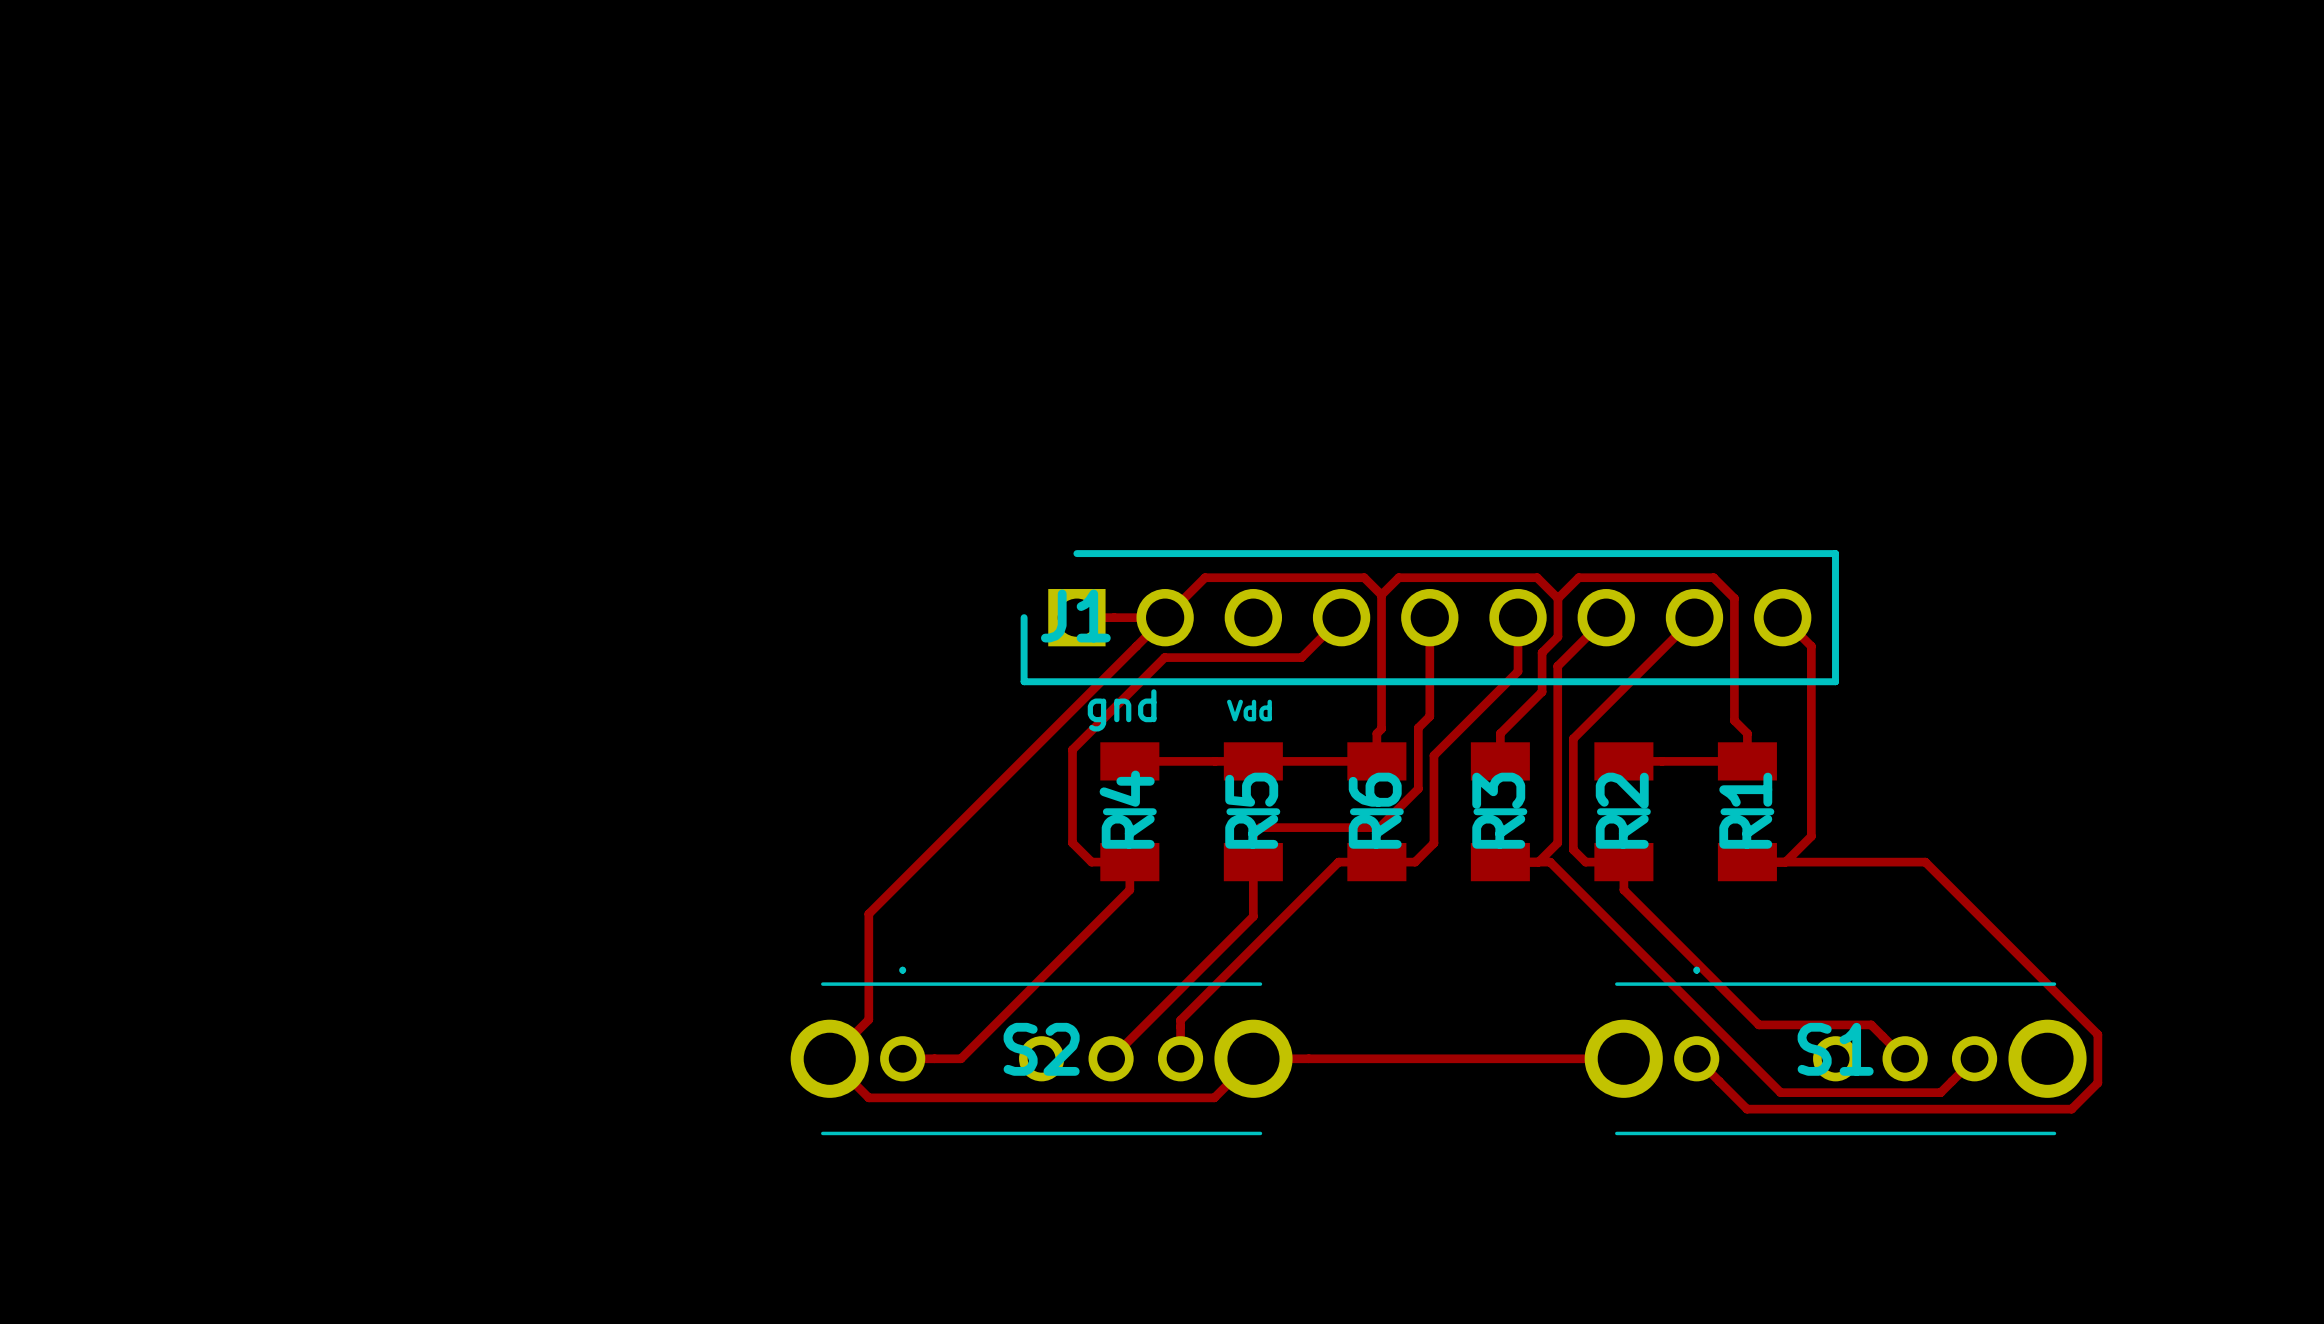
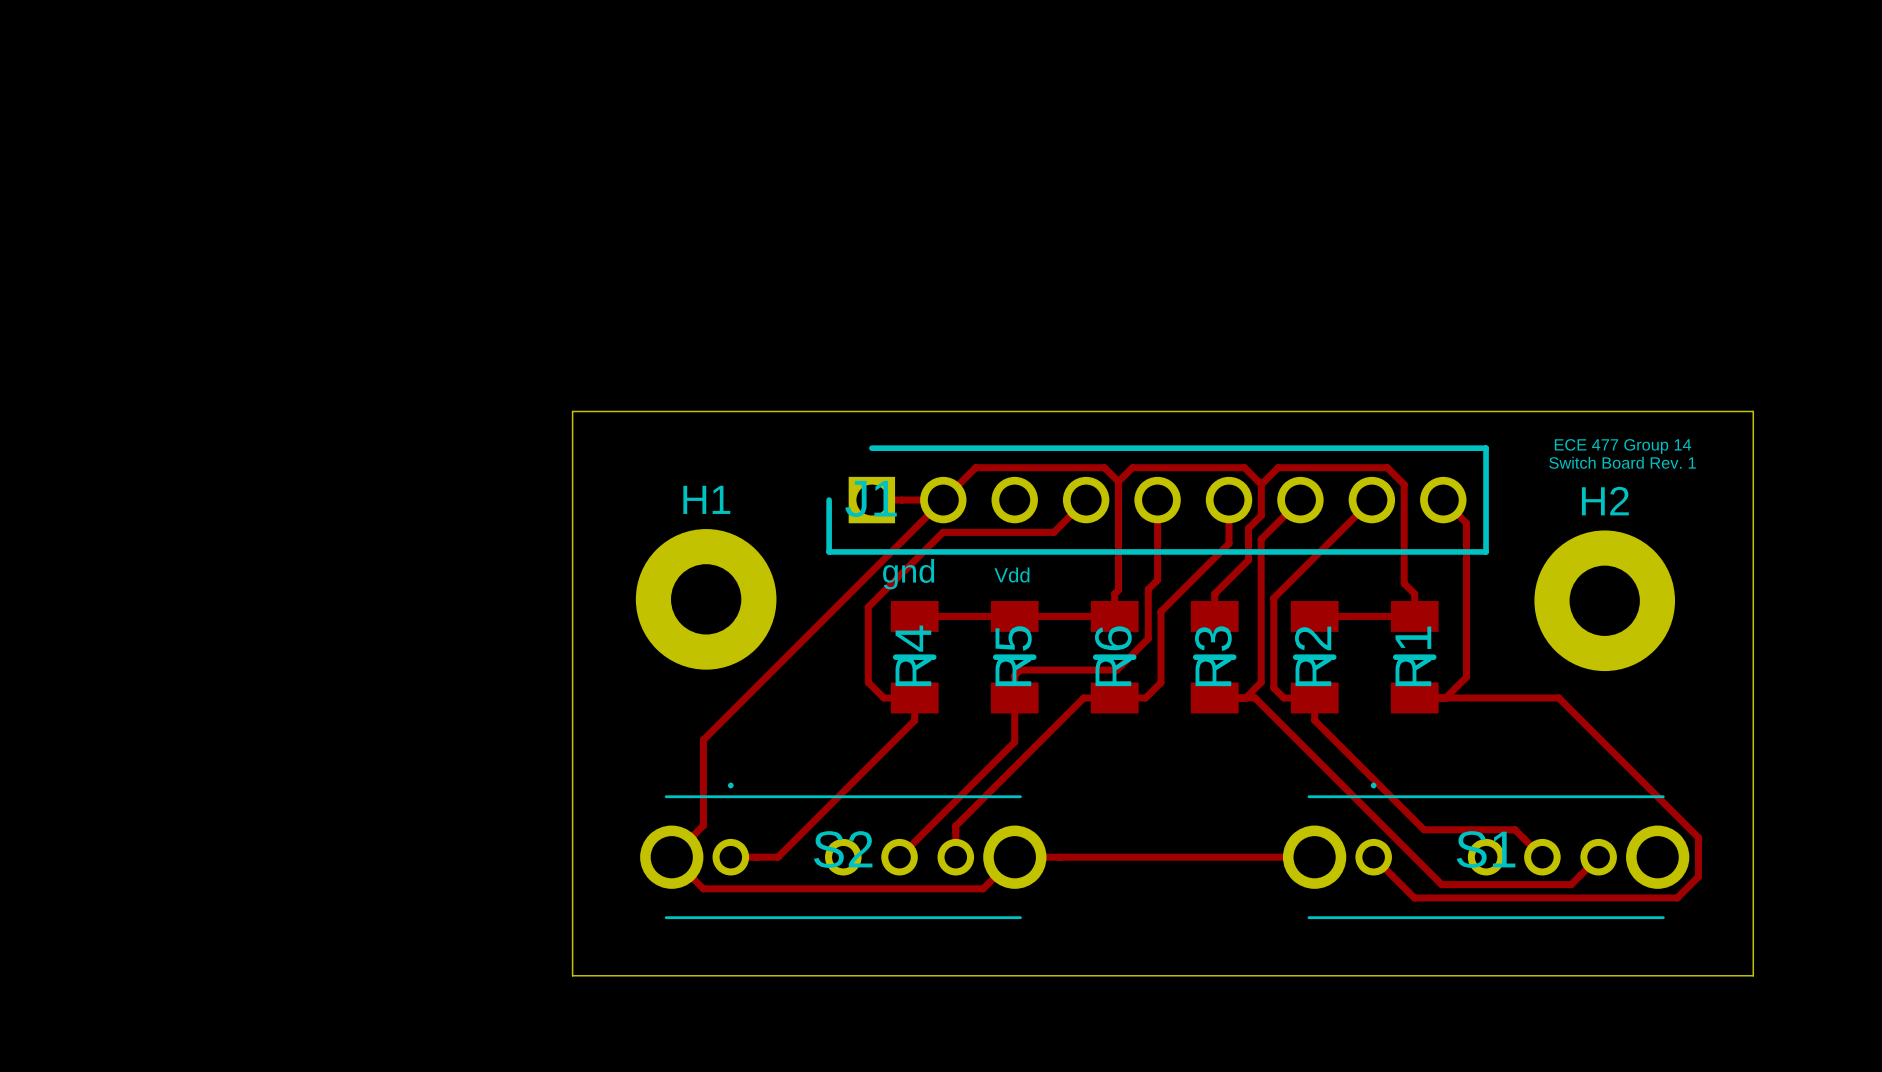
board edge: none -> (572, 411) (572, 975) (1753, 975) (1753, 411) (572, 411)
text: none -> ECE 477 Group 14 (1623, 446)
text: none -> Switch Board Rev. 1 (1622, 462)
H1: none -> (706, 599)
H2: none -> (1604, 600)

